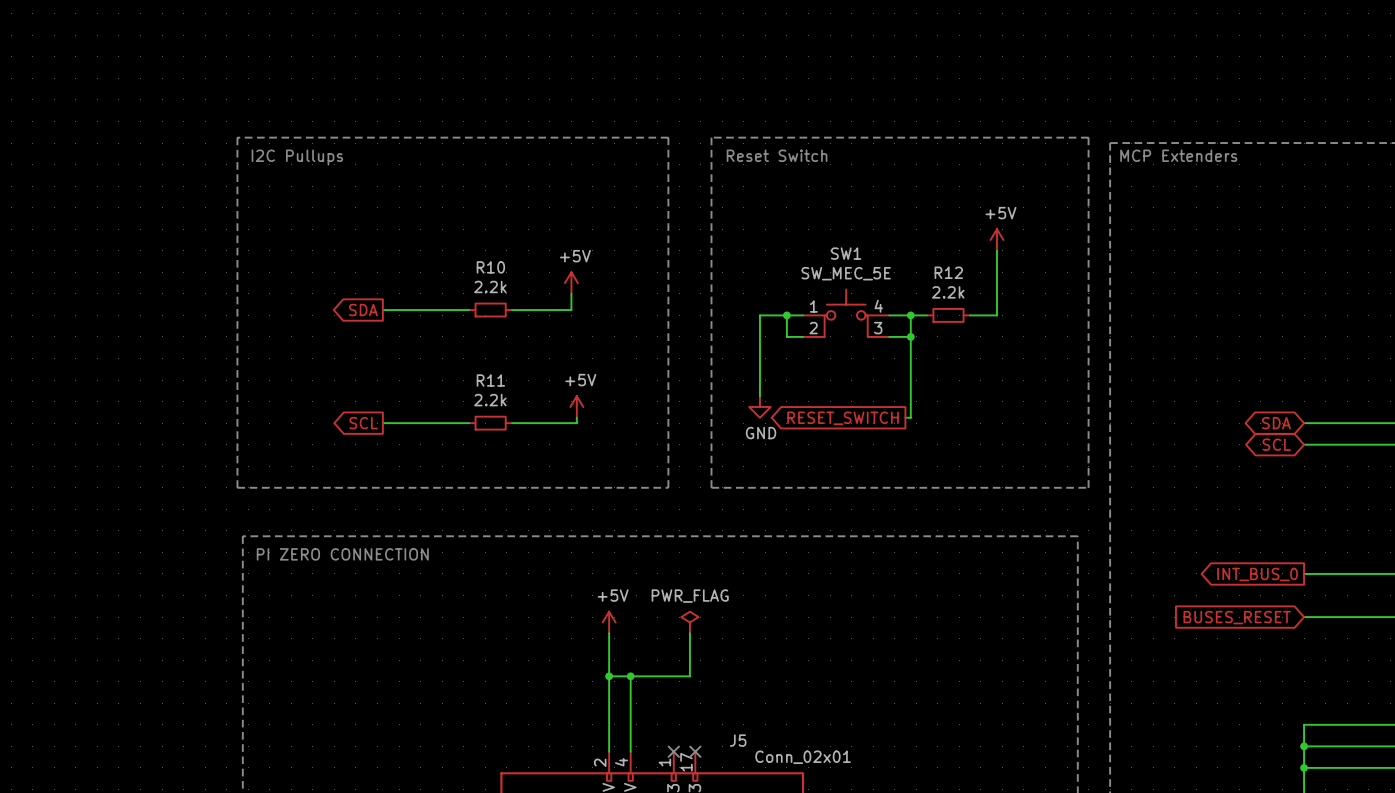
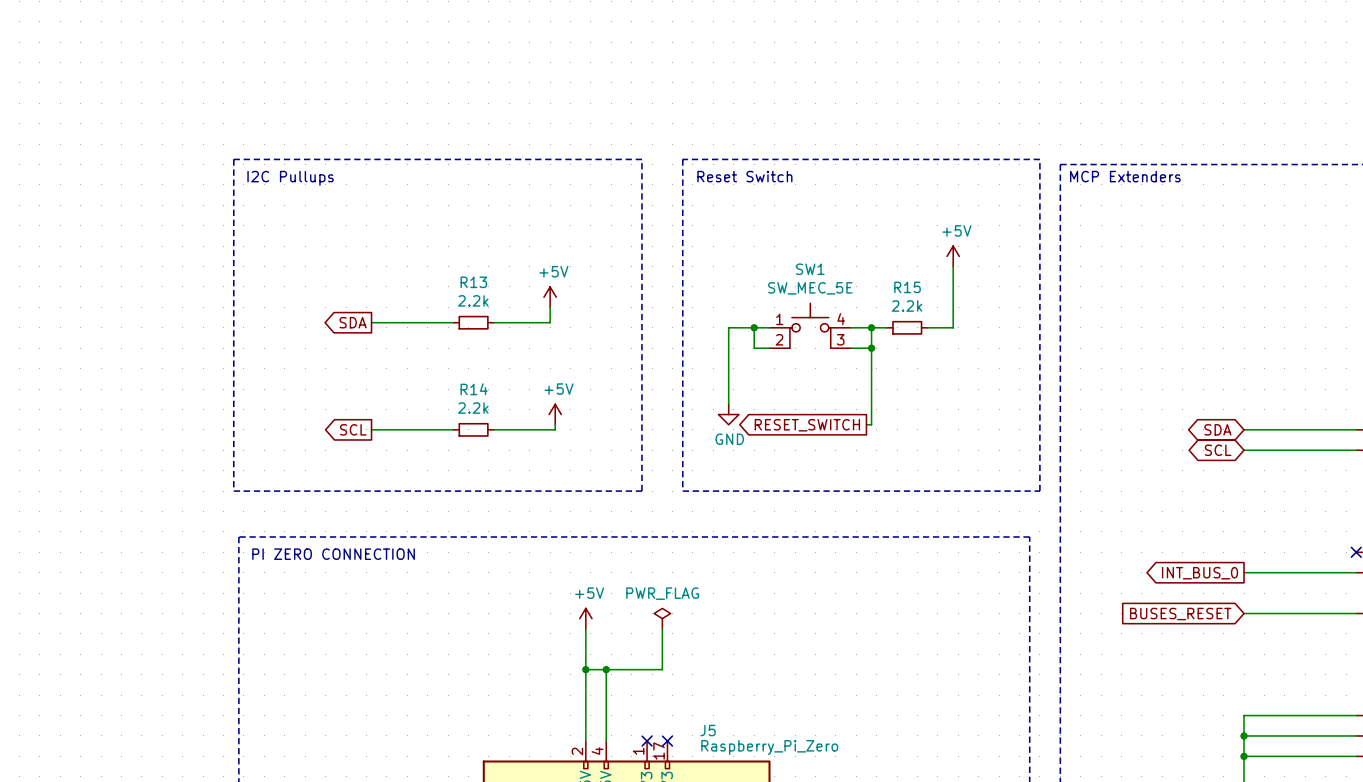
R10 name: R10 (490, 267) -> R13 (473, 282)
R12 name: R12 (948, 272) -> R15 (907, 287)
R11 name: R11 (490, 380) -> R14 (474, 389)
J5 value: Conn_02x01 (803, 757) -> Raspberry_Pi_Zero (769, 747)

